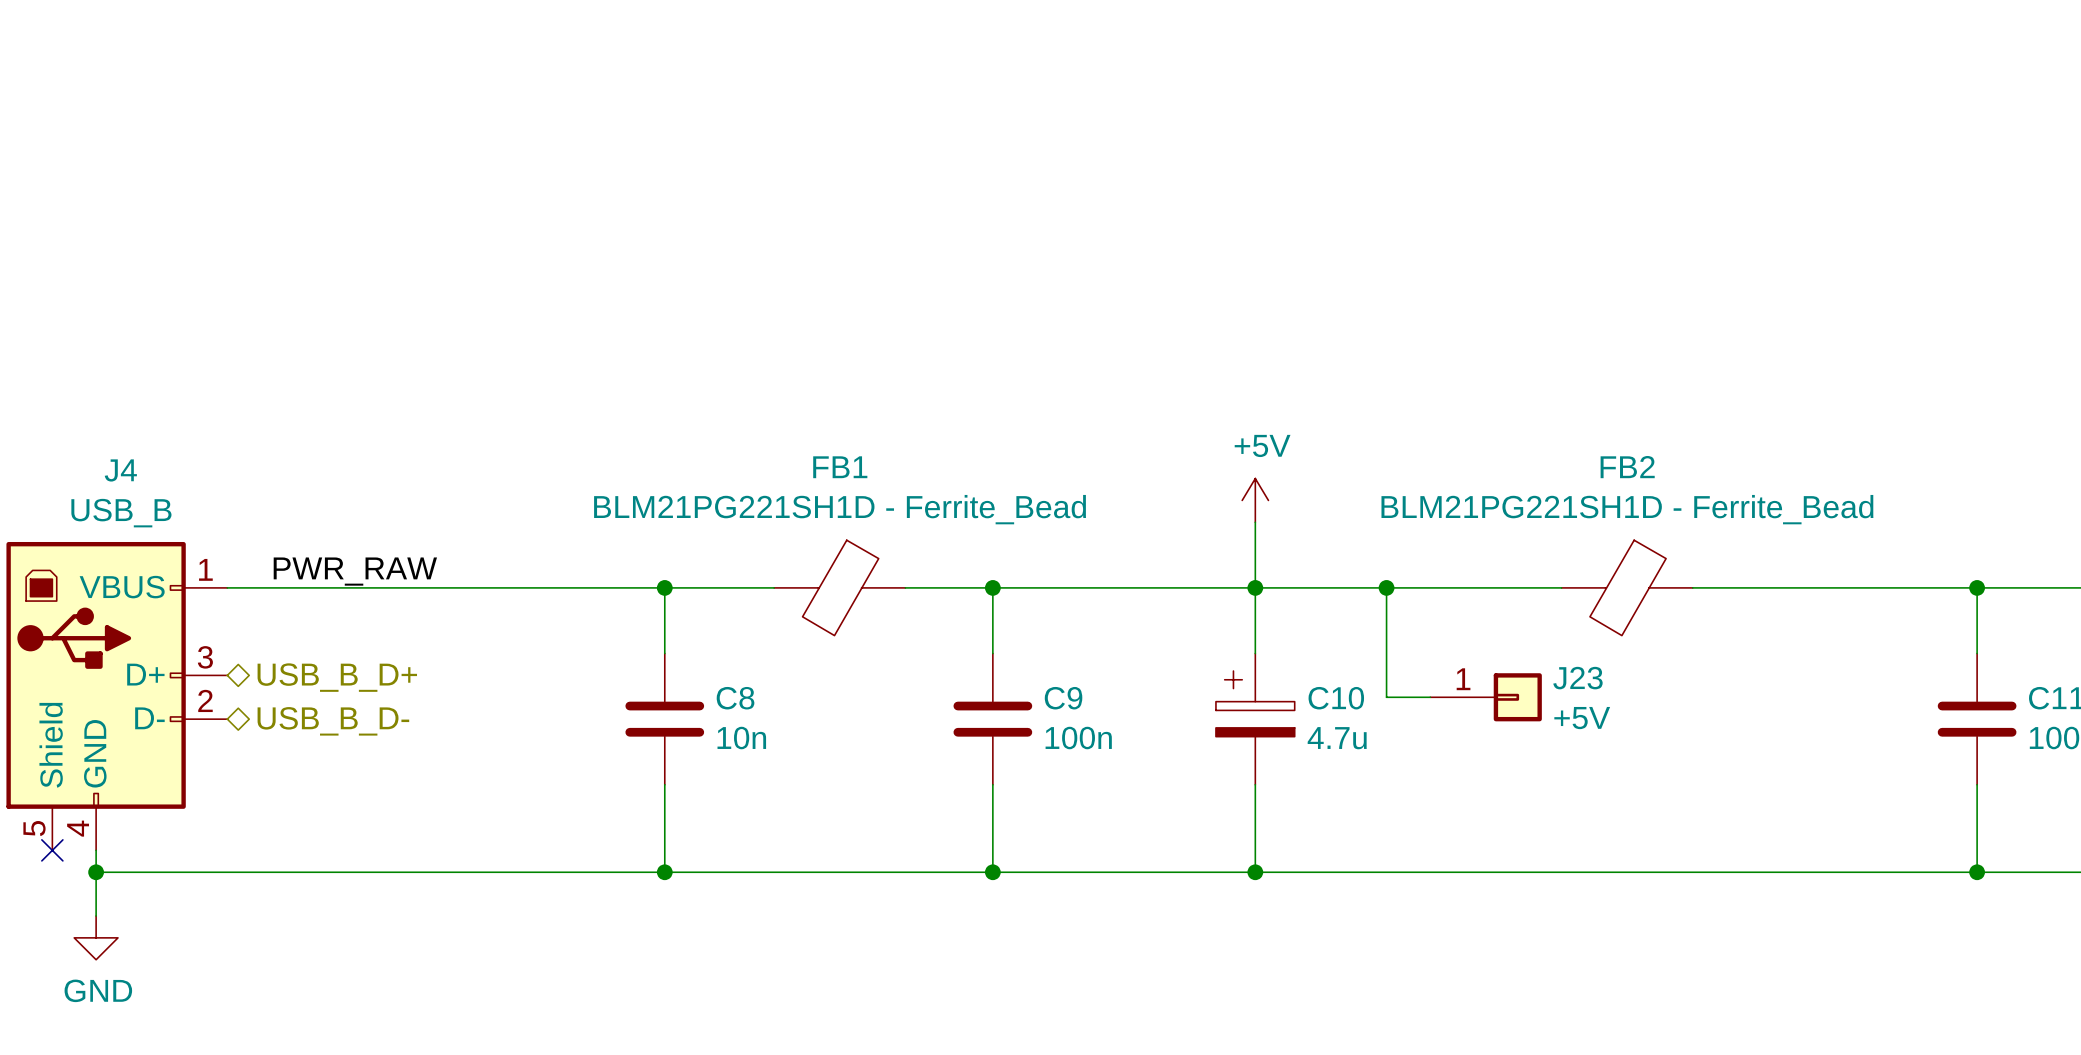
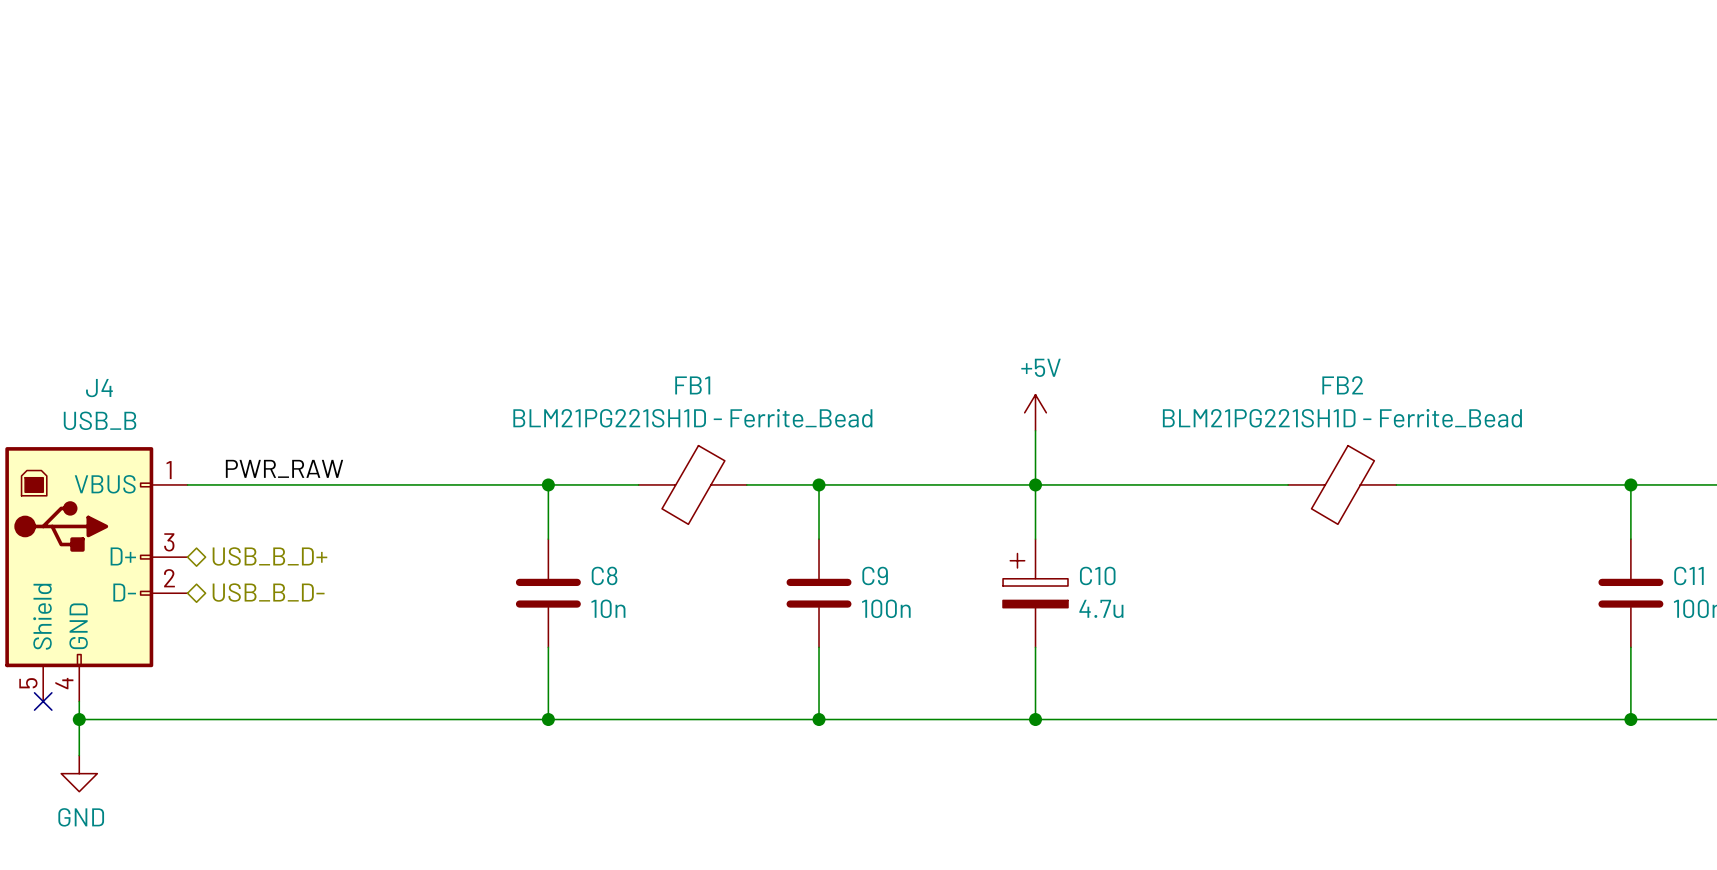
wire: (1386, 587) (1386, 697) (1430, 697) -> none
junction: (1386, 587) -> none
J23: +5V (1486, 697) -> none

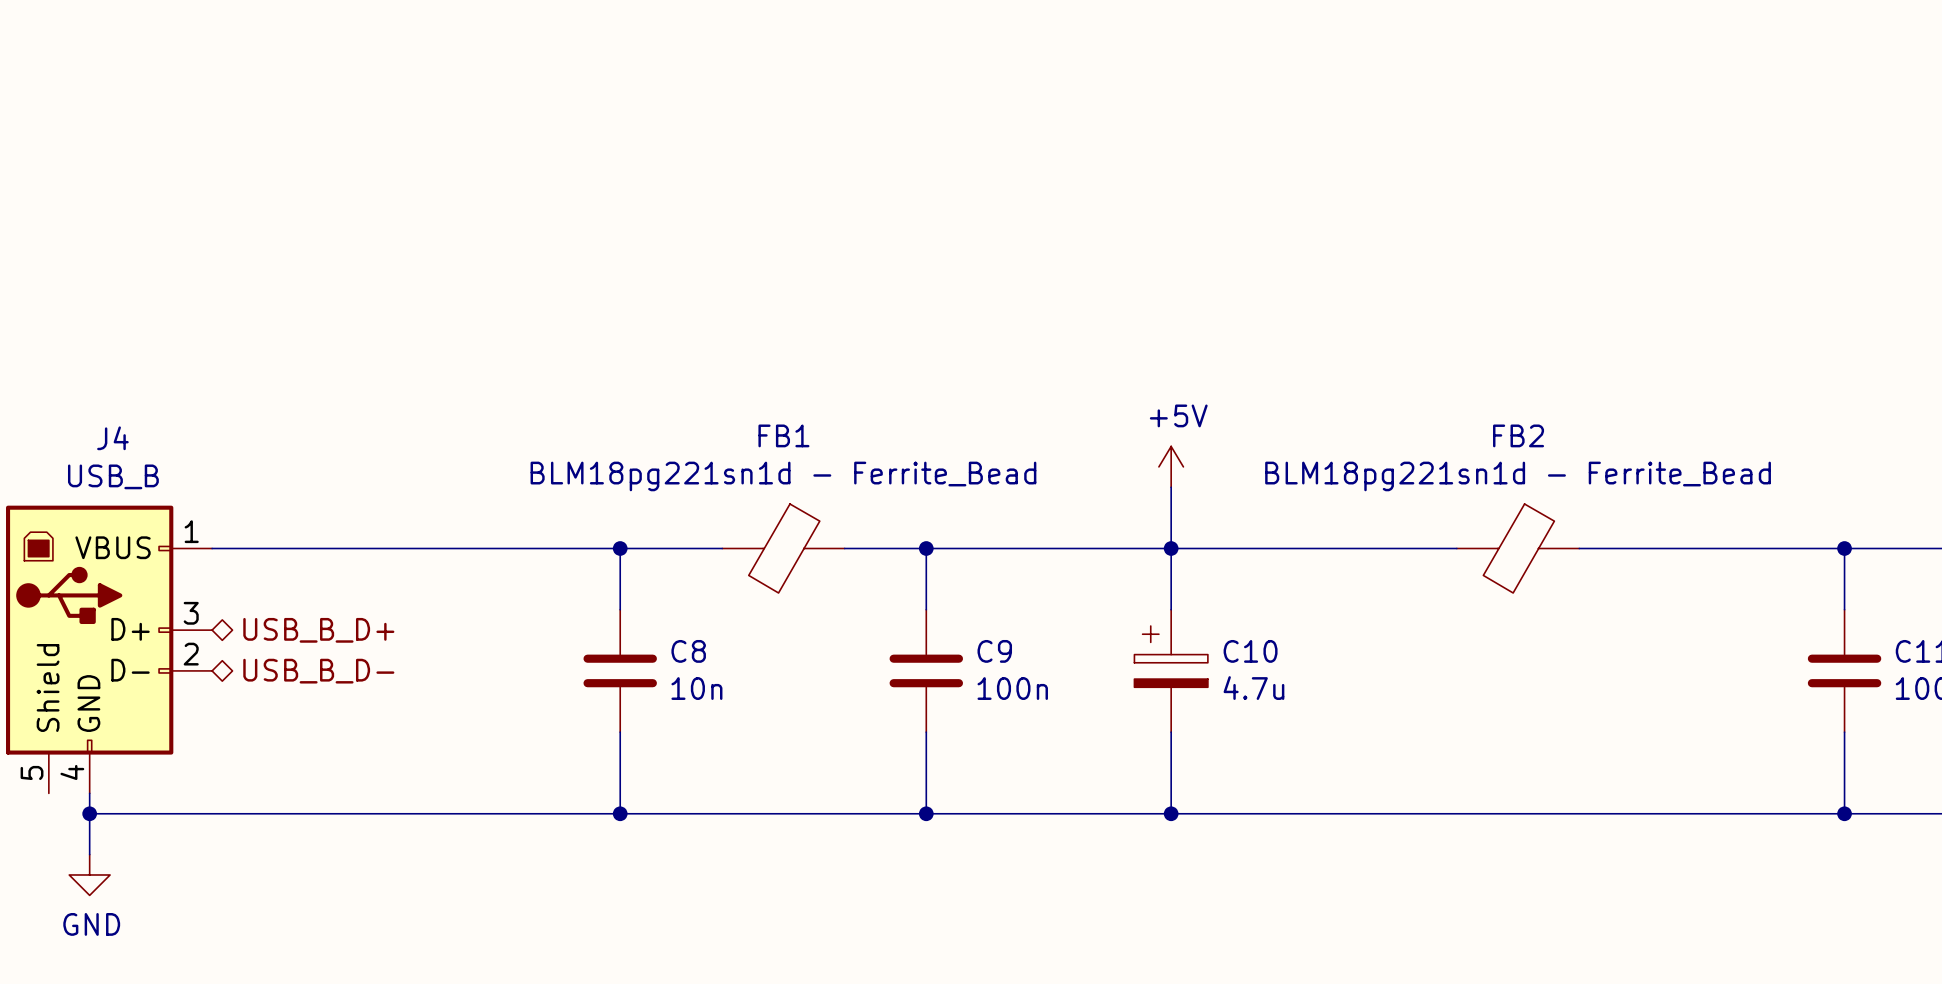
FB1 value: BLM21PG221SH1D - Ferrite_Bead (692, 418) -> BLM18pg221sn1d - Ferrite_Bead (783, 476)
FB2 value: BLM21PG221SH1D - Ferrite_Bead (1342, 418) -> BLM18pg221sn1d - Ferrite_Bead (1518, 476)
label: PWR_RAW (284, 468) -> none
no-connect mark: (43, 701) -> none

